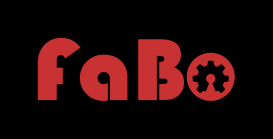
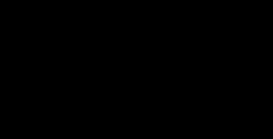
part: (136, 69) -> none

